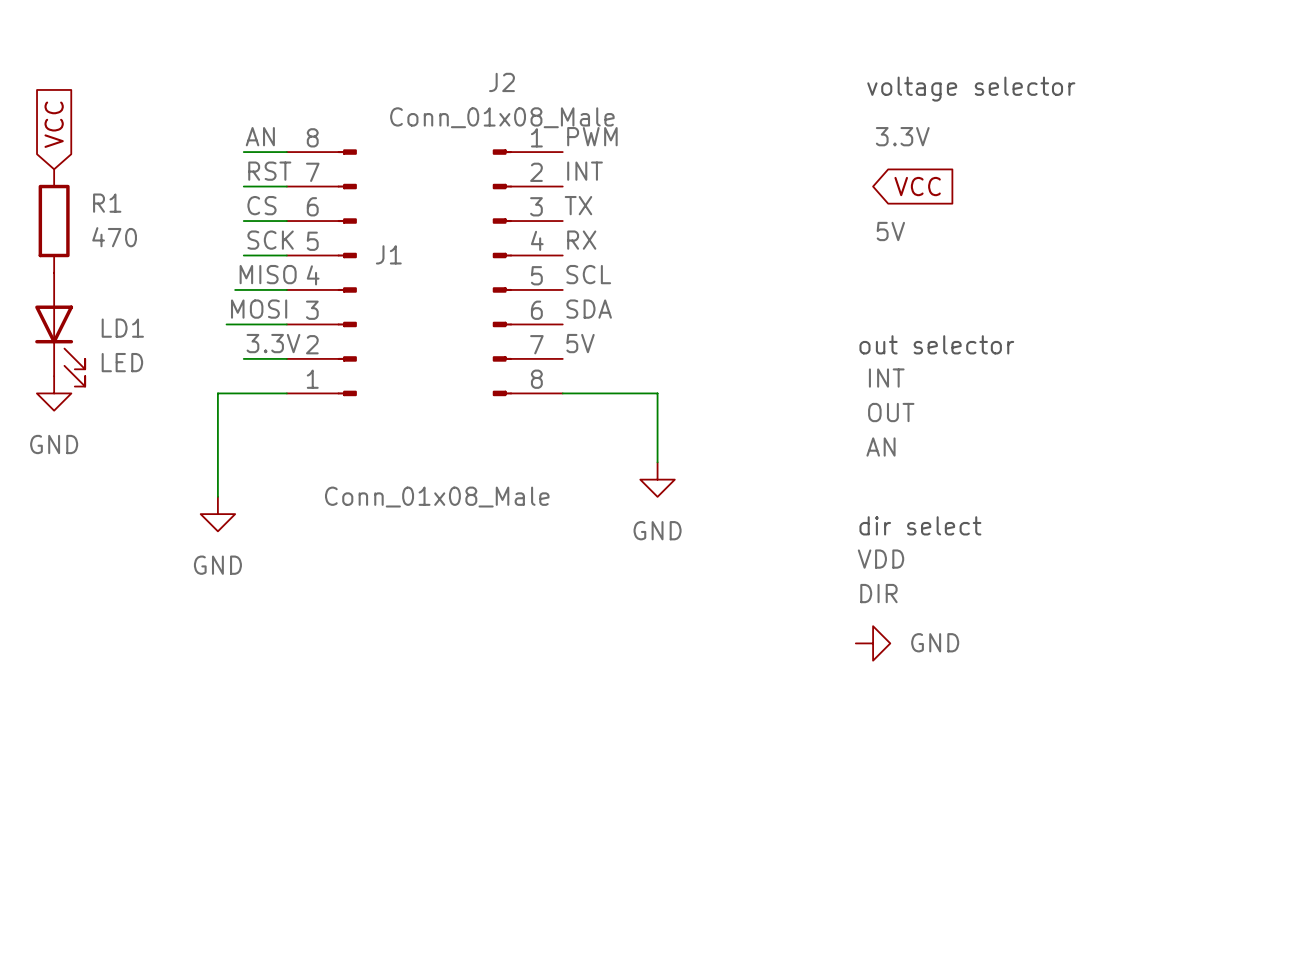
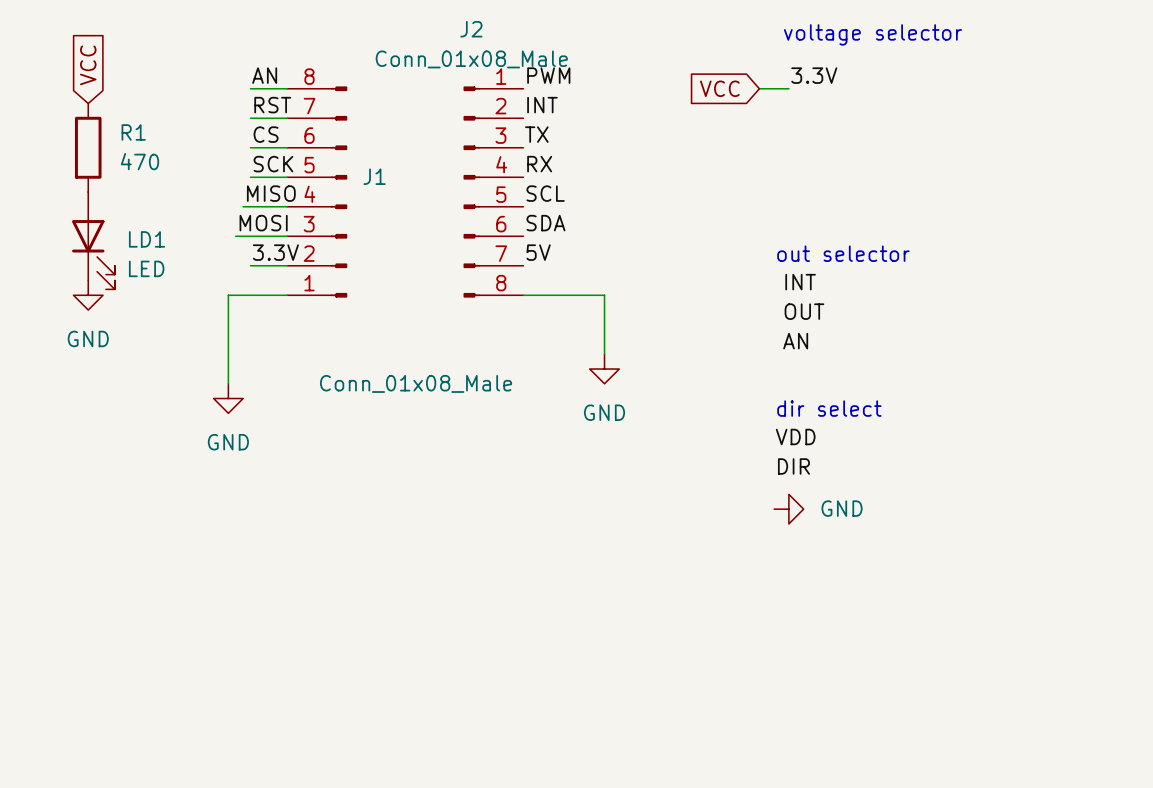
wire: none -> (759, 88) (788, 88)
global label rotation: 0° (917, 186) -> 180° (719, 88)
global label position: VCC (917, 186) -> VCC (719, 88)
label: 5V (890, 231) -> none

